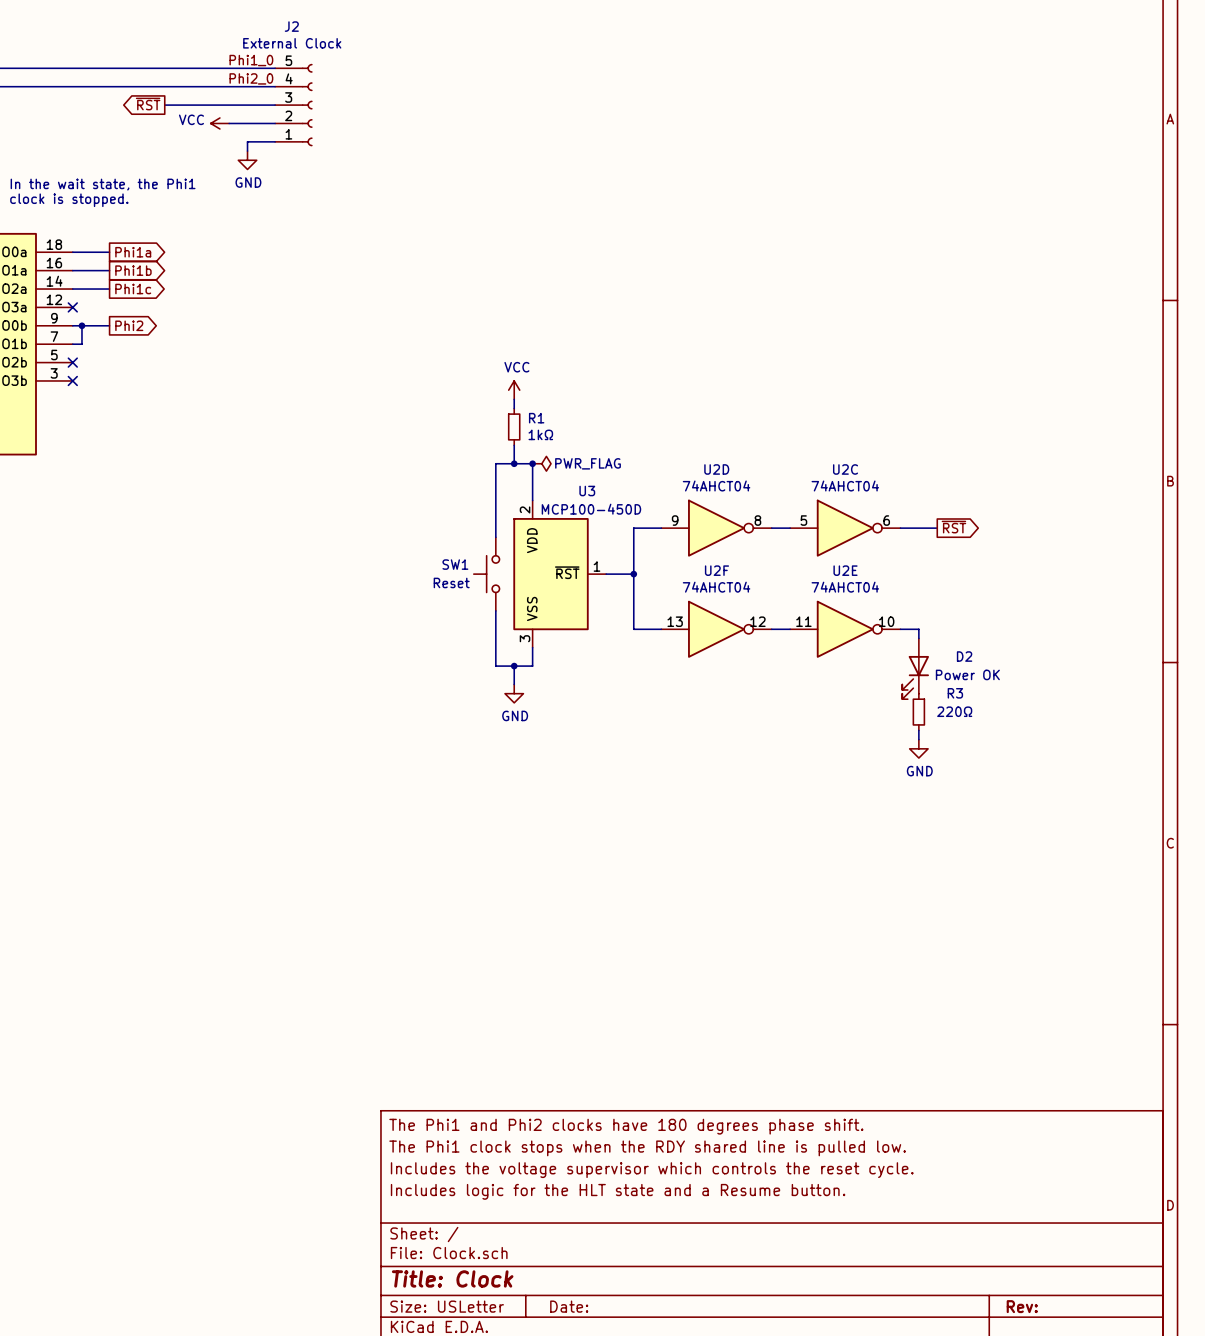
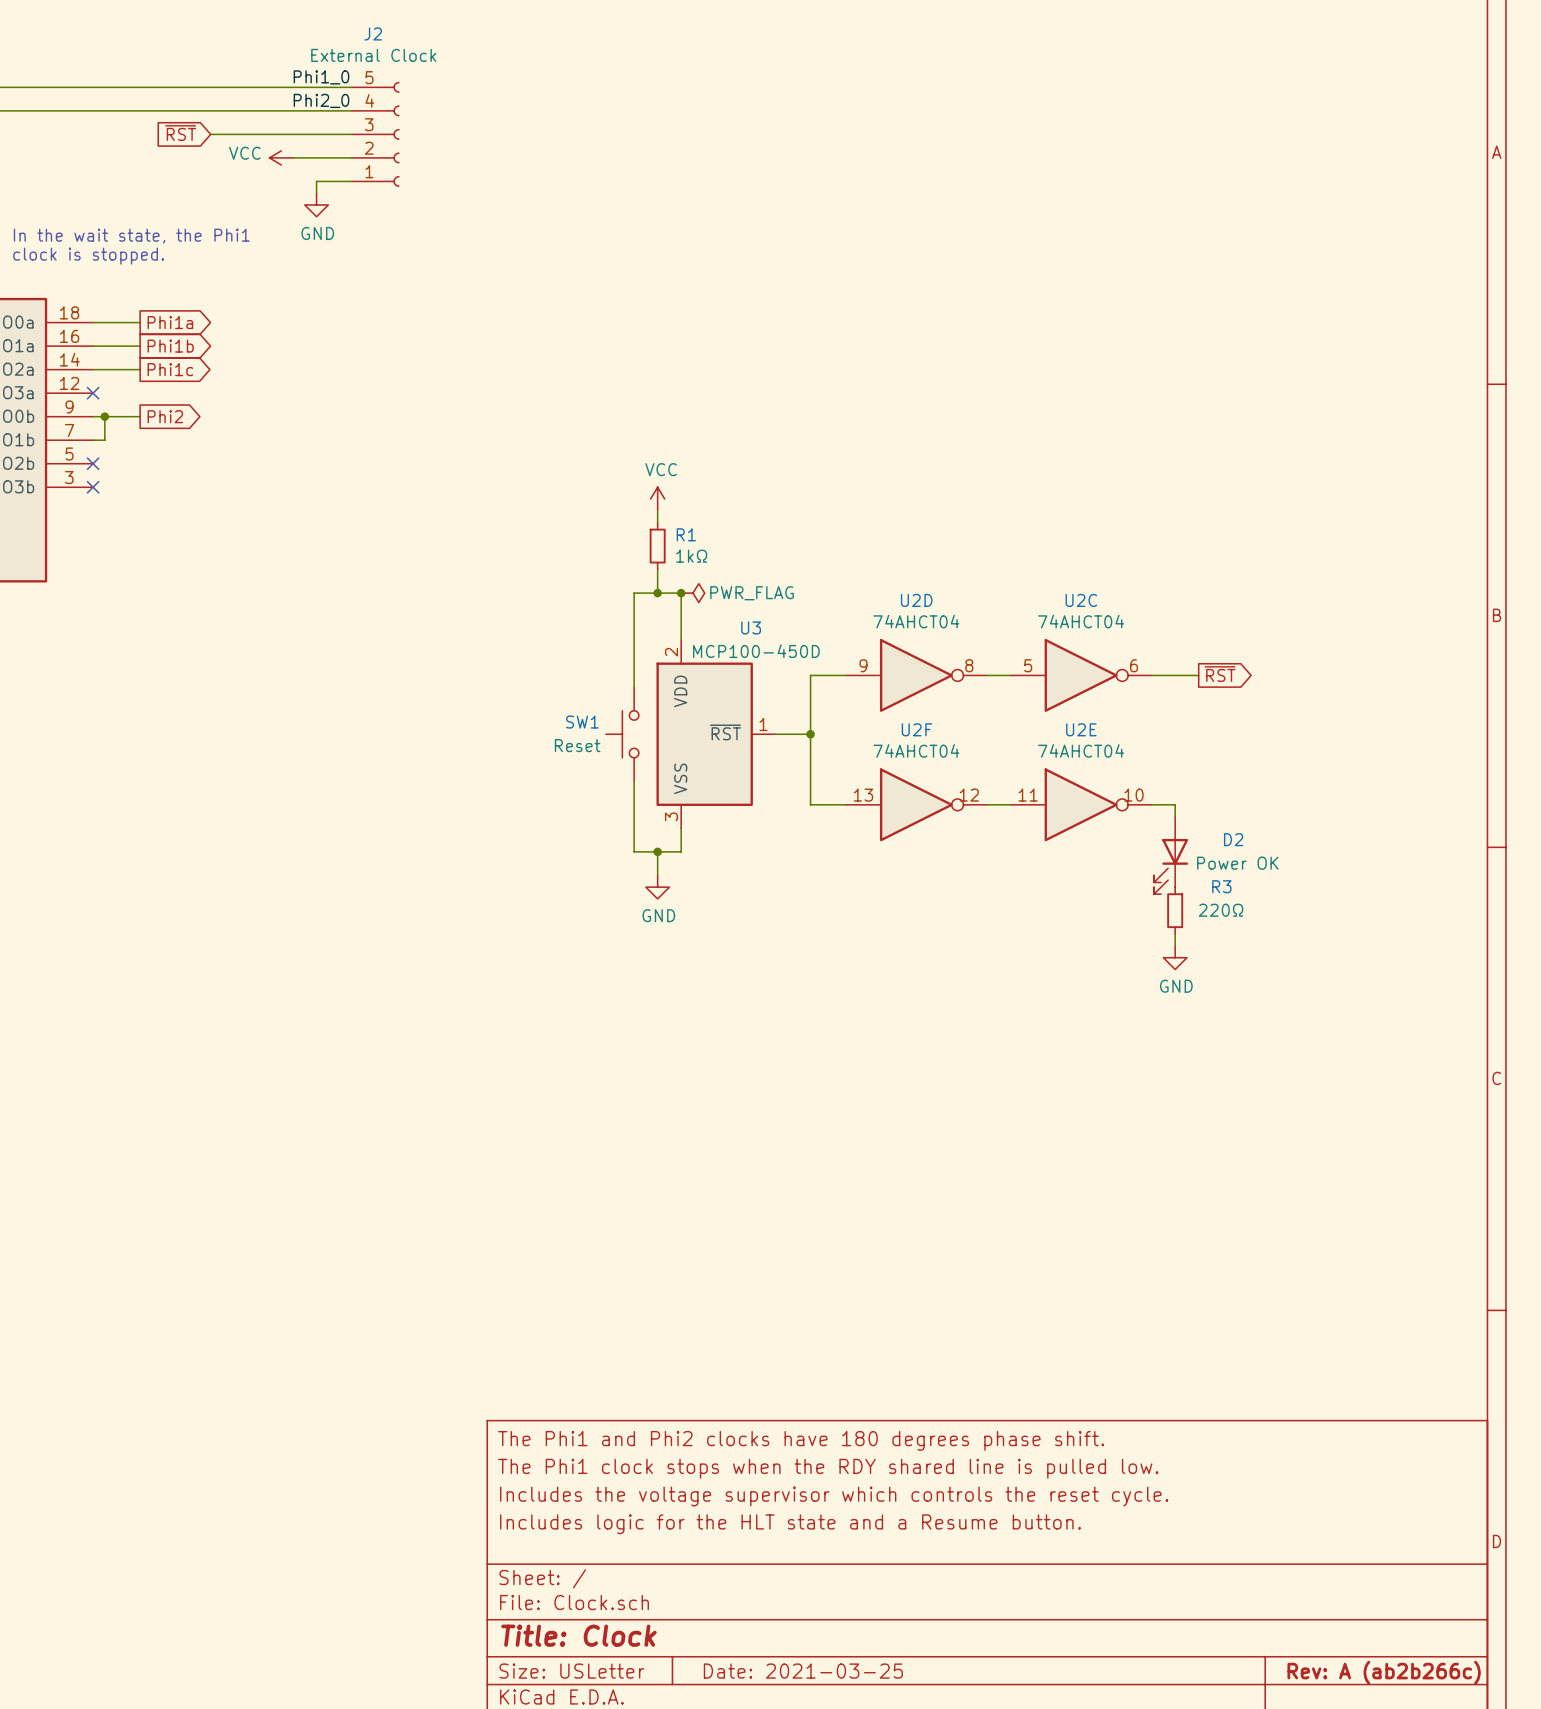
global label shape: output (148, 104) -> input (180, 133)
title block: Date: (569, 1306) -> Date: 2021-03-25 (803, 1671)
title block: Rev: (1022, 1306) -> Rev: A (ab2b266c) (1384, 1672)

